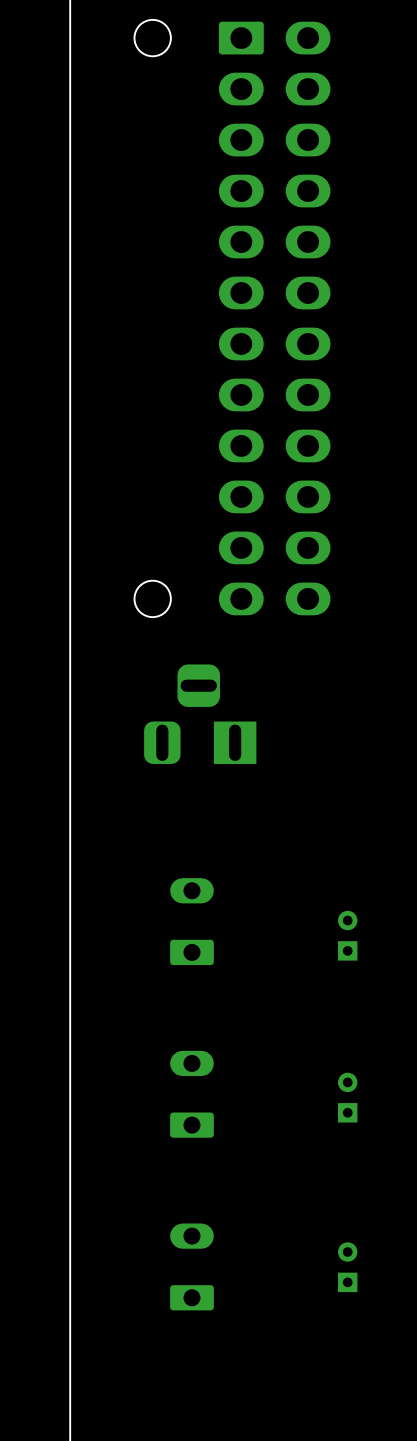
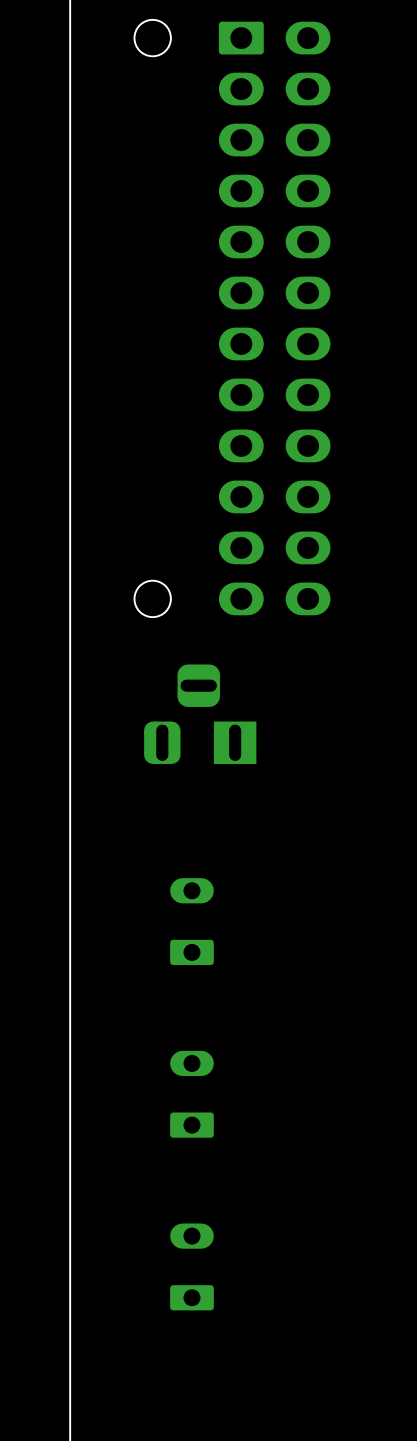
part: (347, 935) -> none
part: (347, 1097) -> none
part: (347, 1267) -> none

